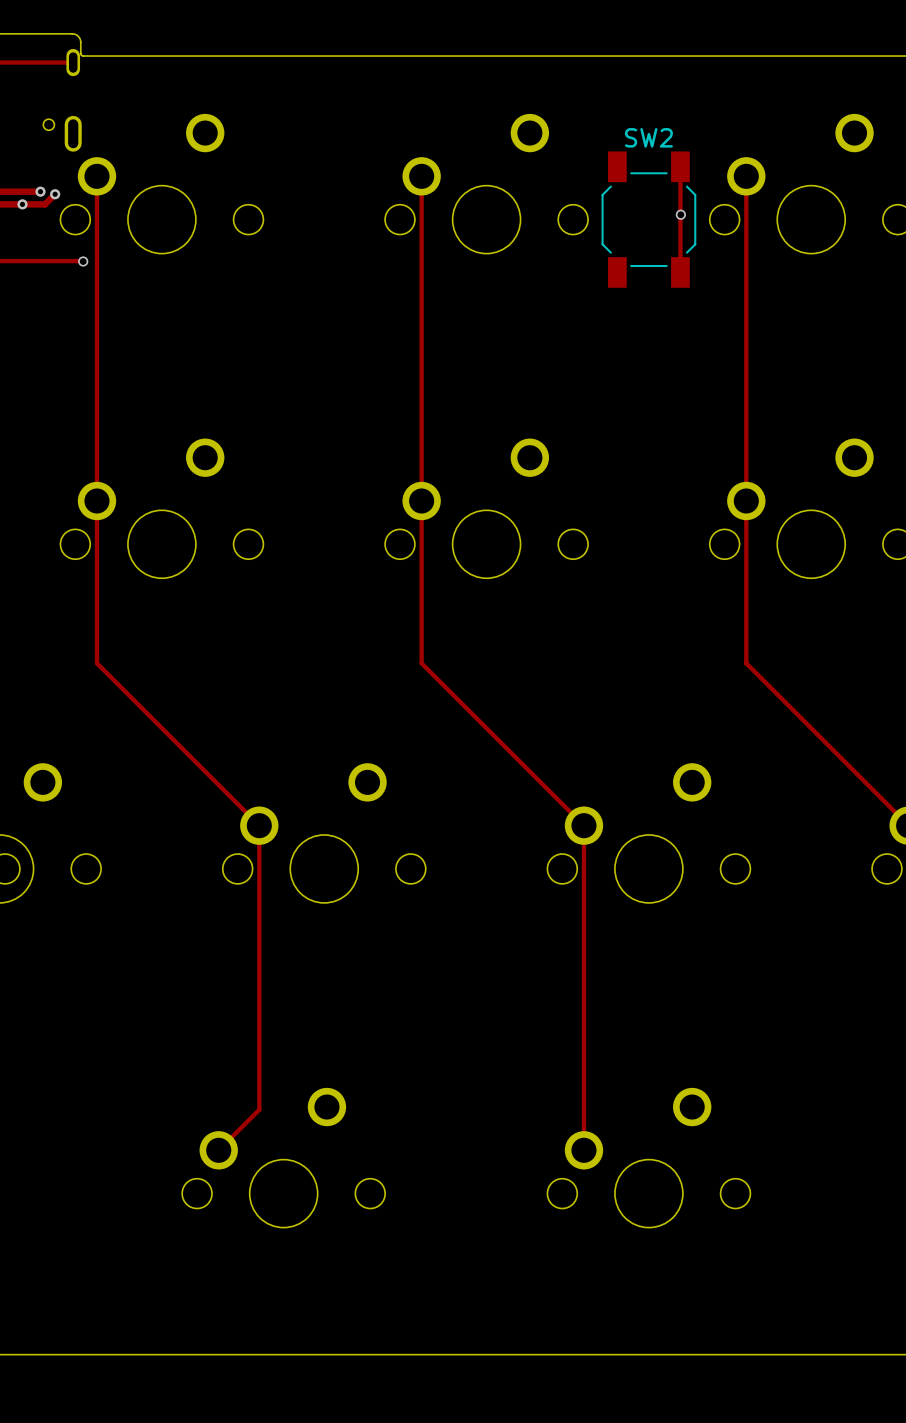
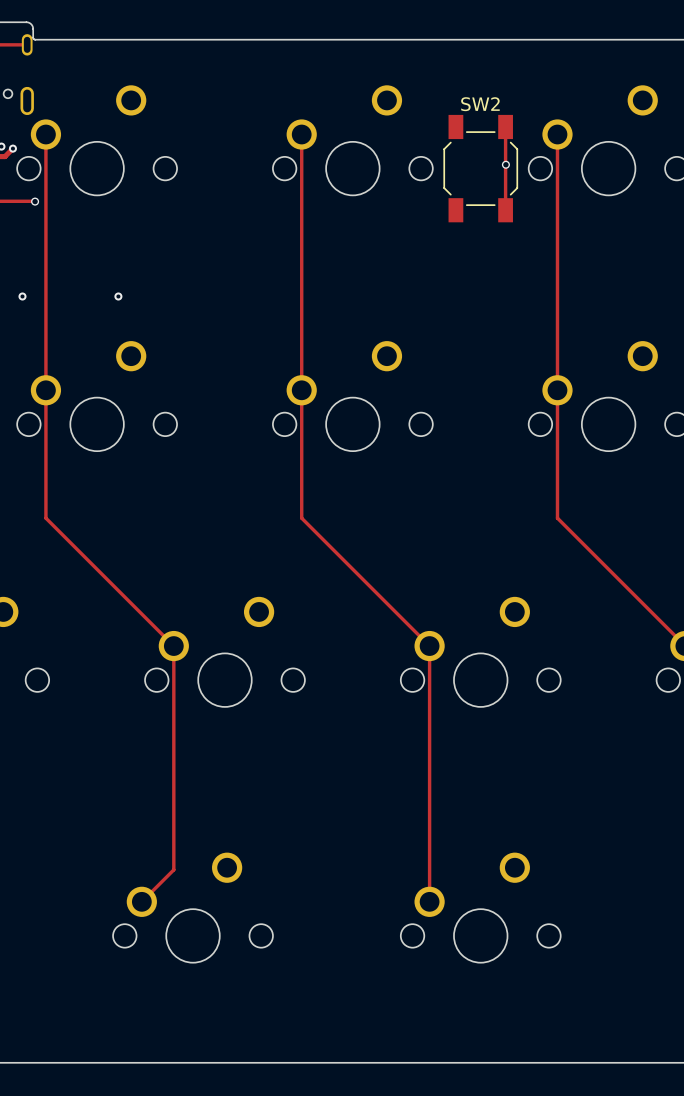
via: none -> (22, 296)
via: none -> (118, 296)

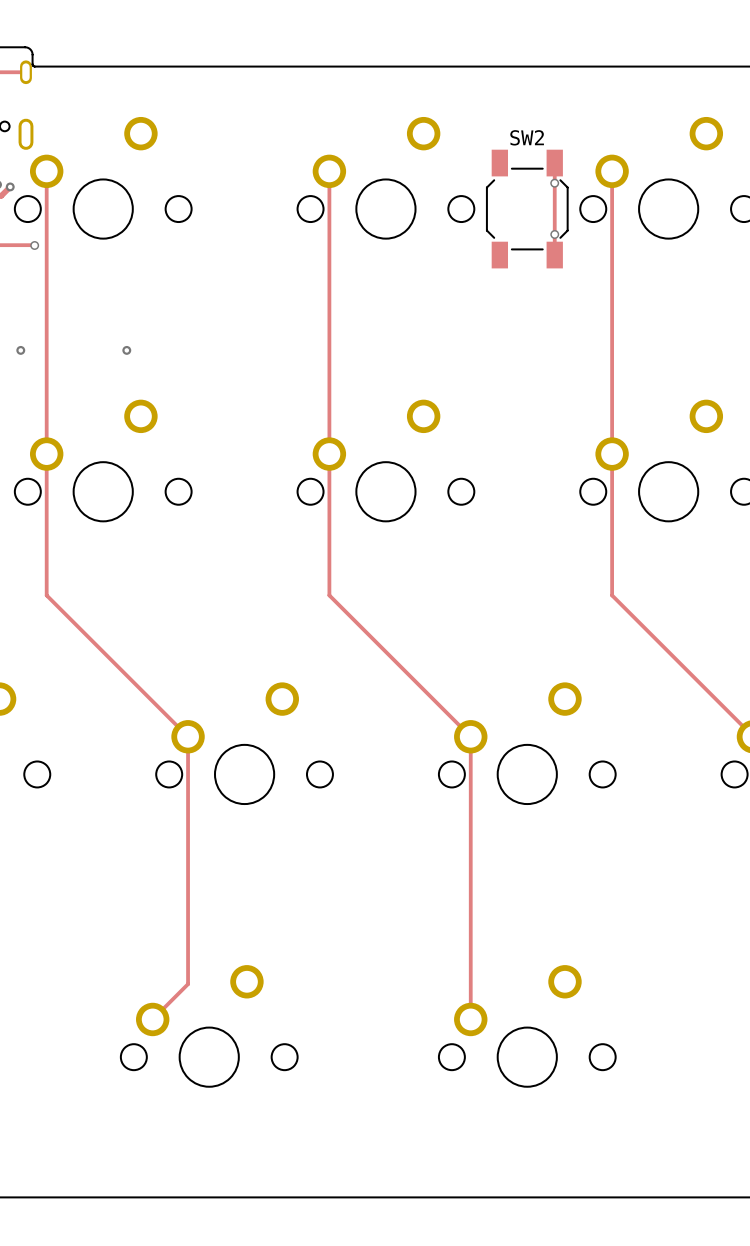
via: none -> (554, 183)
via: (505, 164) -> none
via: none -> (554, 234)

